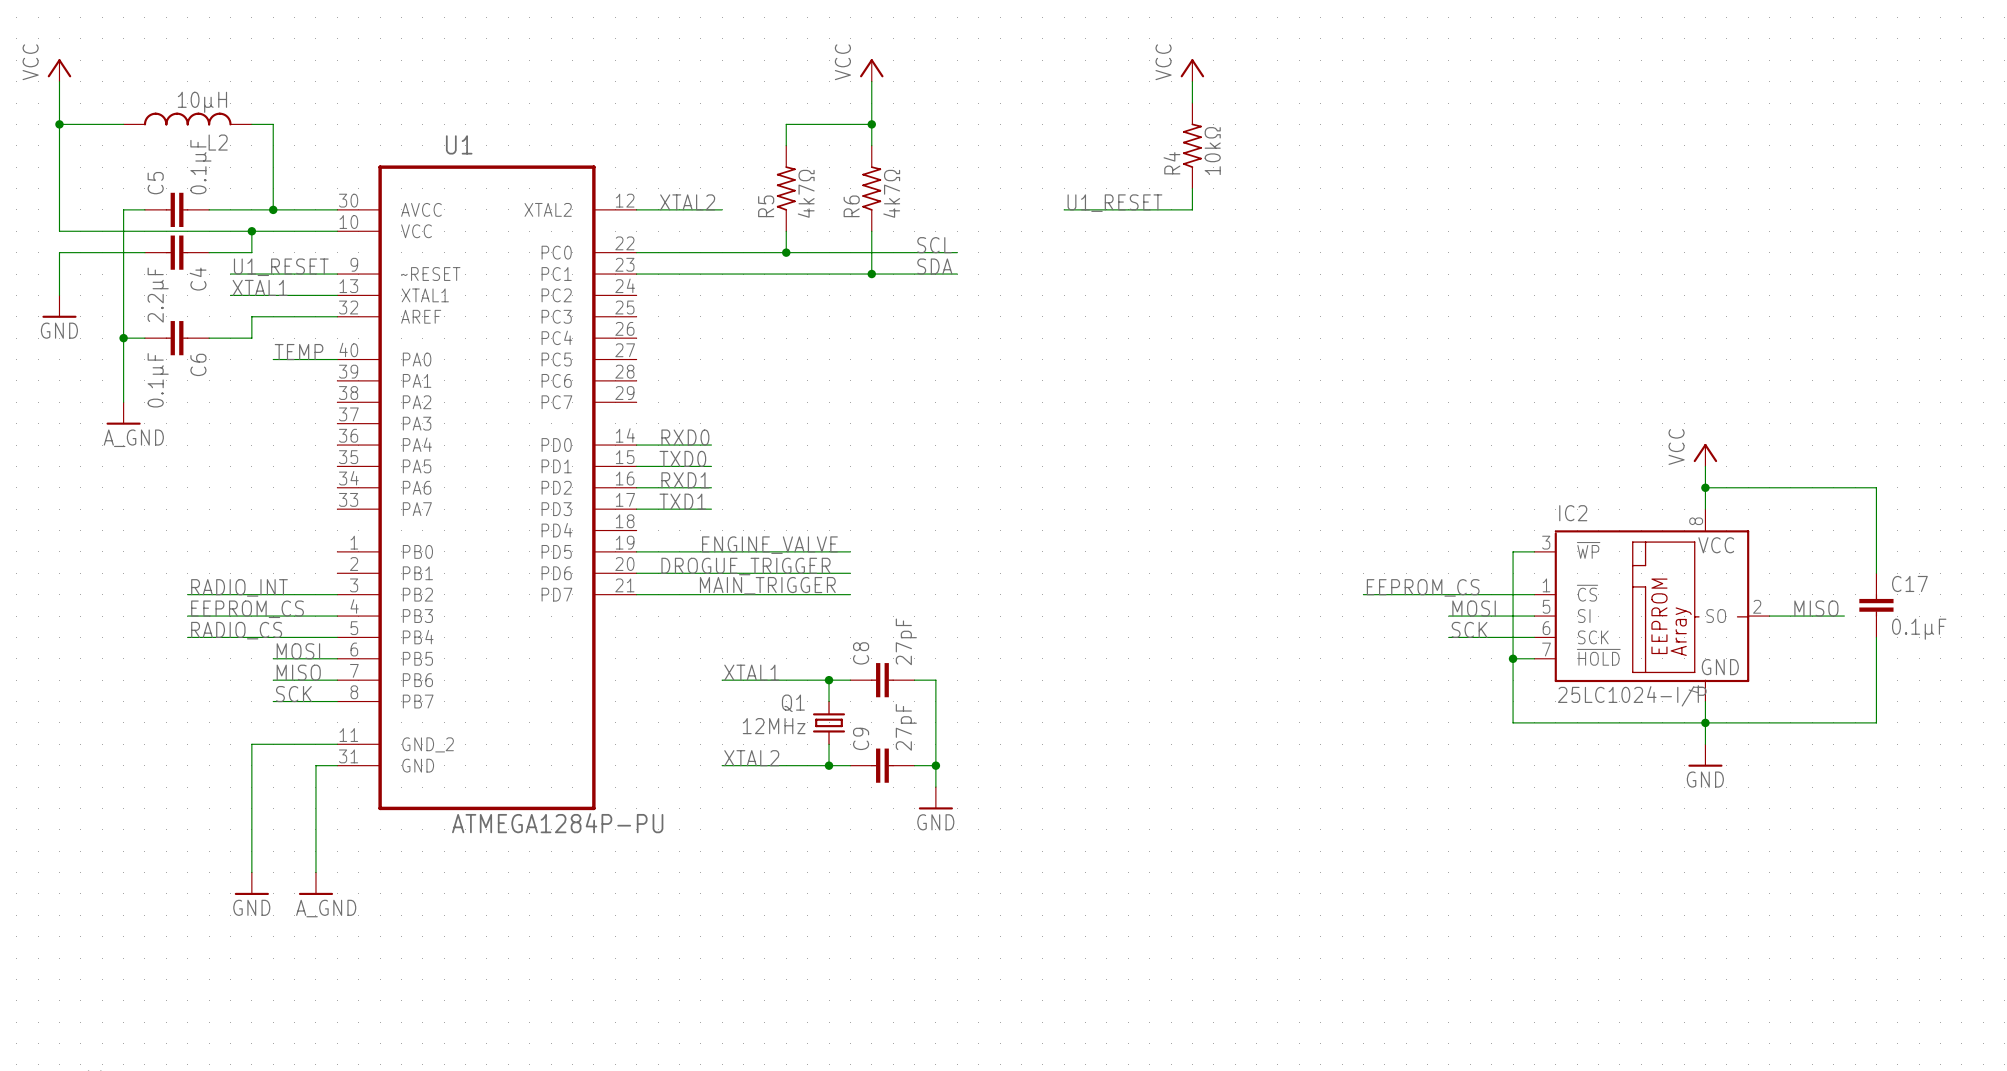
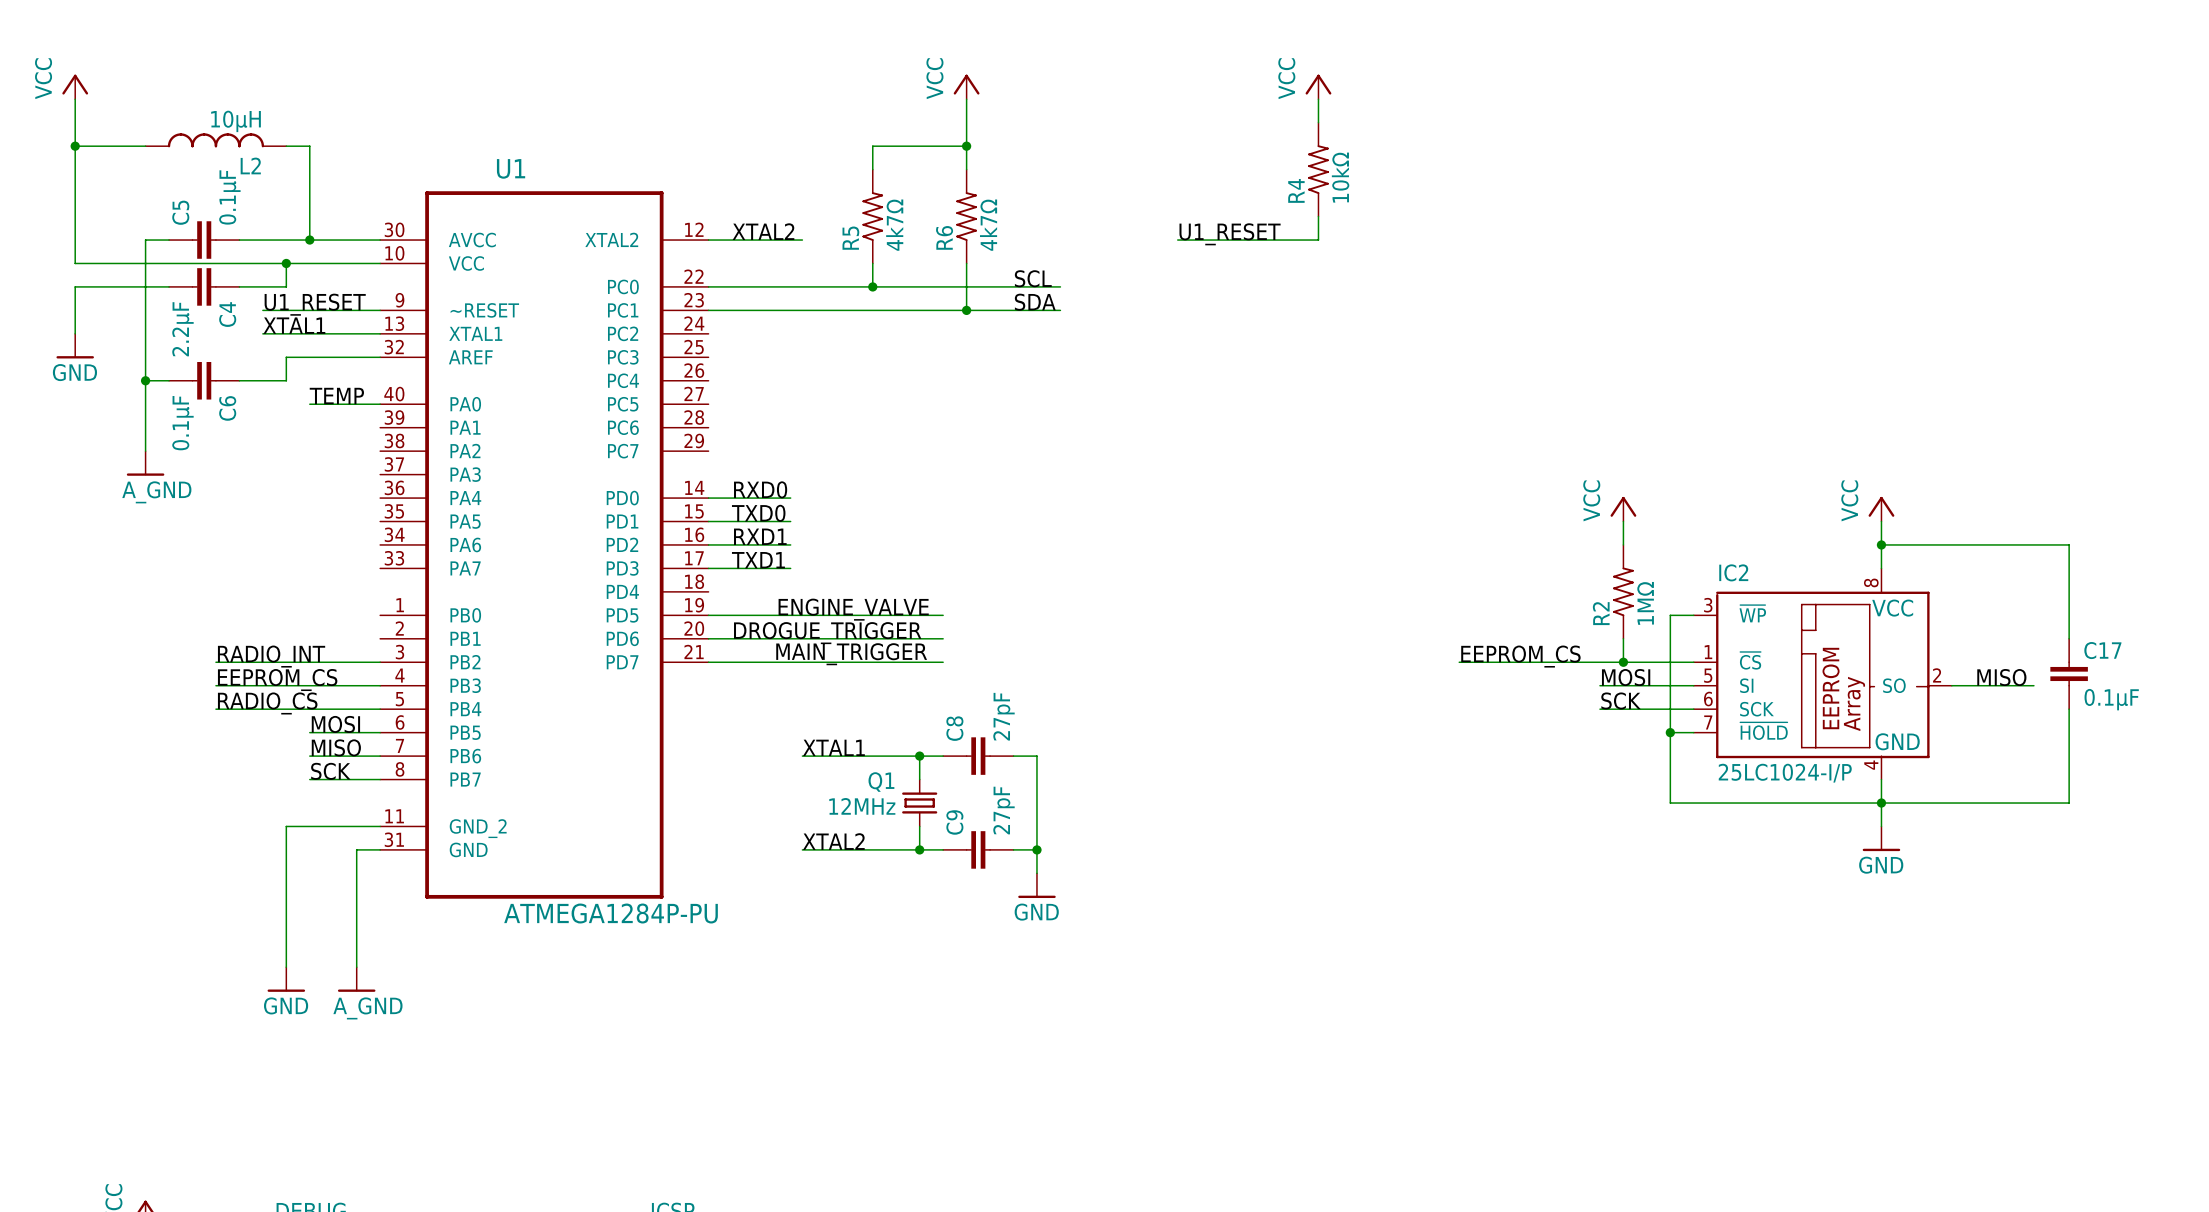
power symbol: none -> VCC (1623, 509)
wire: none -> (1623, 521) (1623, 544)
R2: none -> 1MΩ (1623, 591)
wire: none -> (1623, 638) (1623, 662)
label position: EEPROM_CS (1423, 587) -> EEPROM_CS (1520, 656)
wire: none -> (1459, 662) (1506, 662)
junction: none -> (1623, 662)

